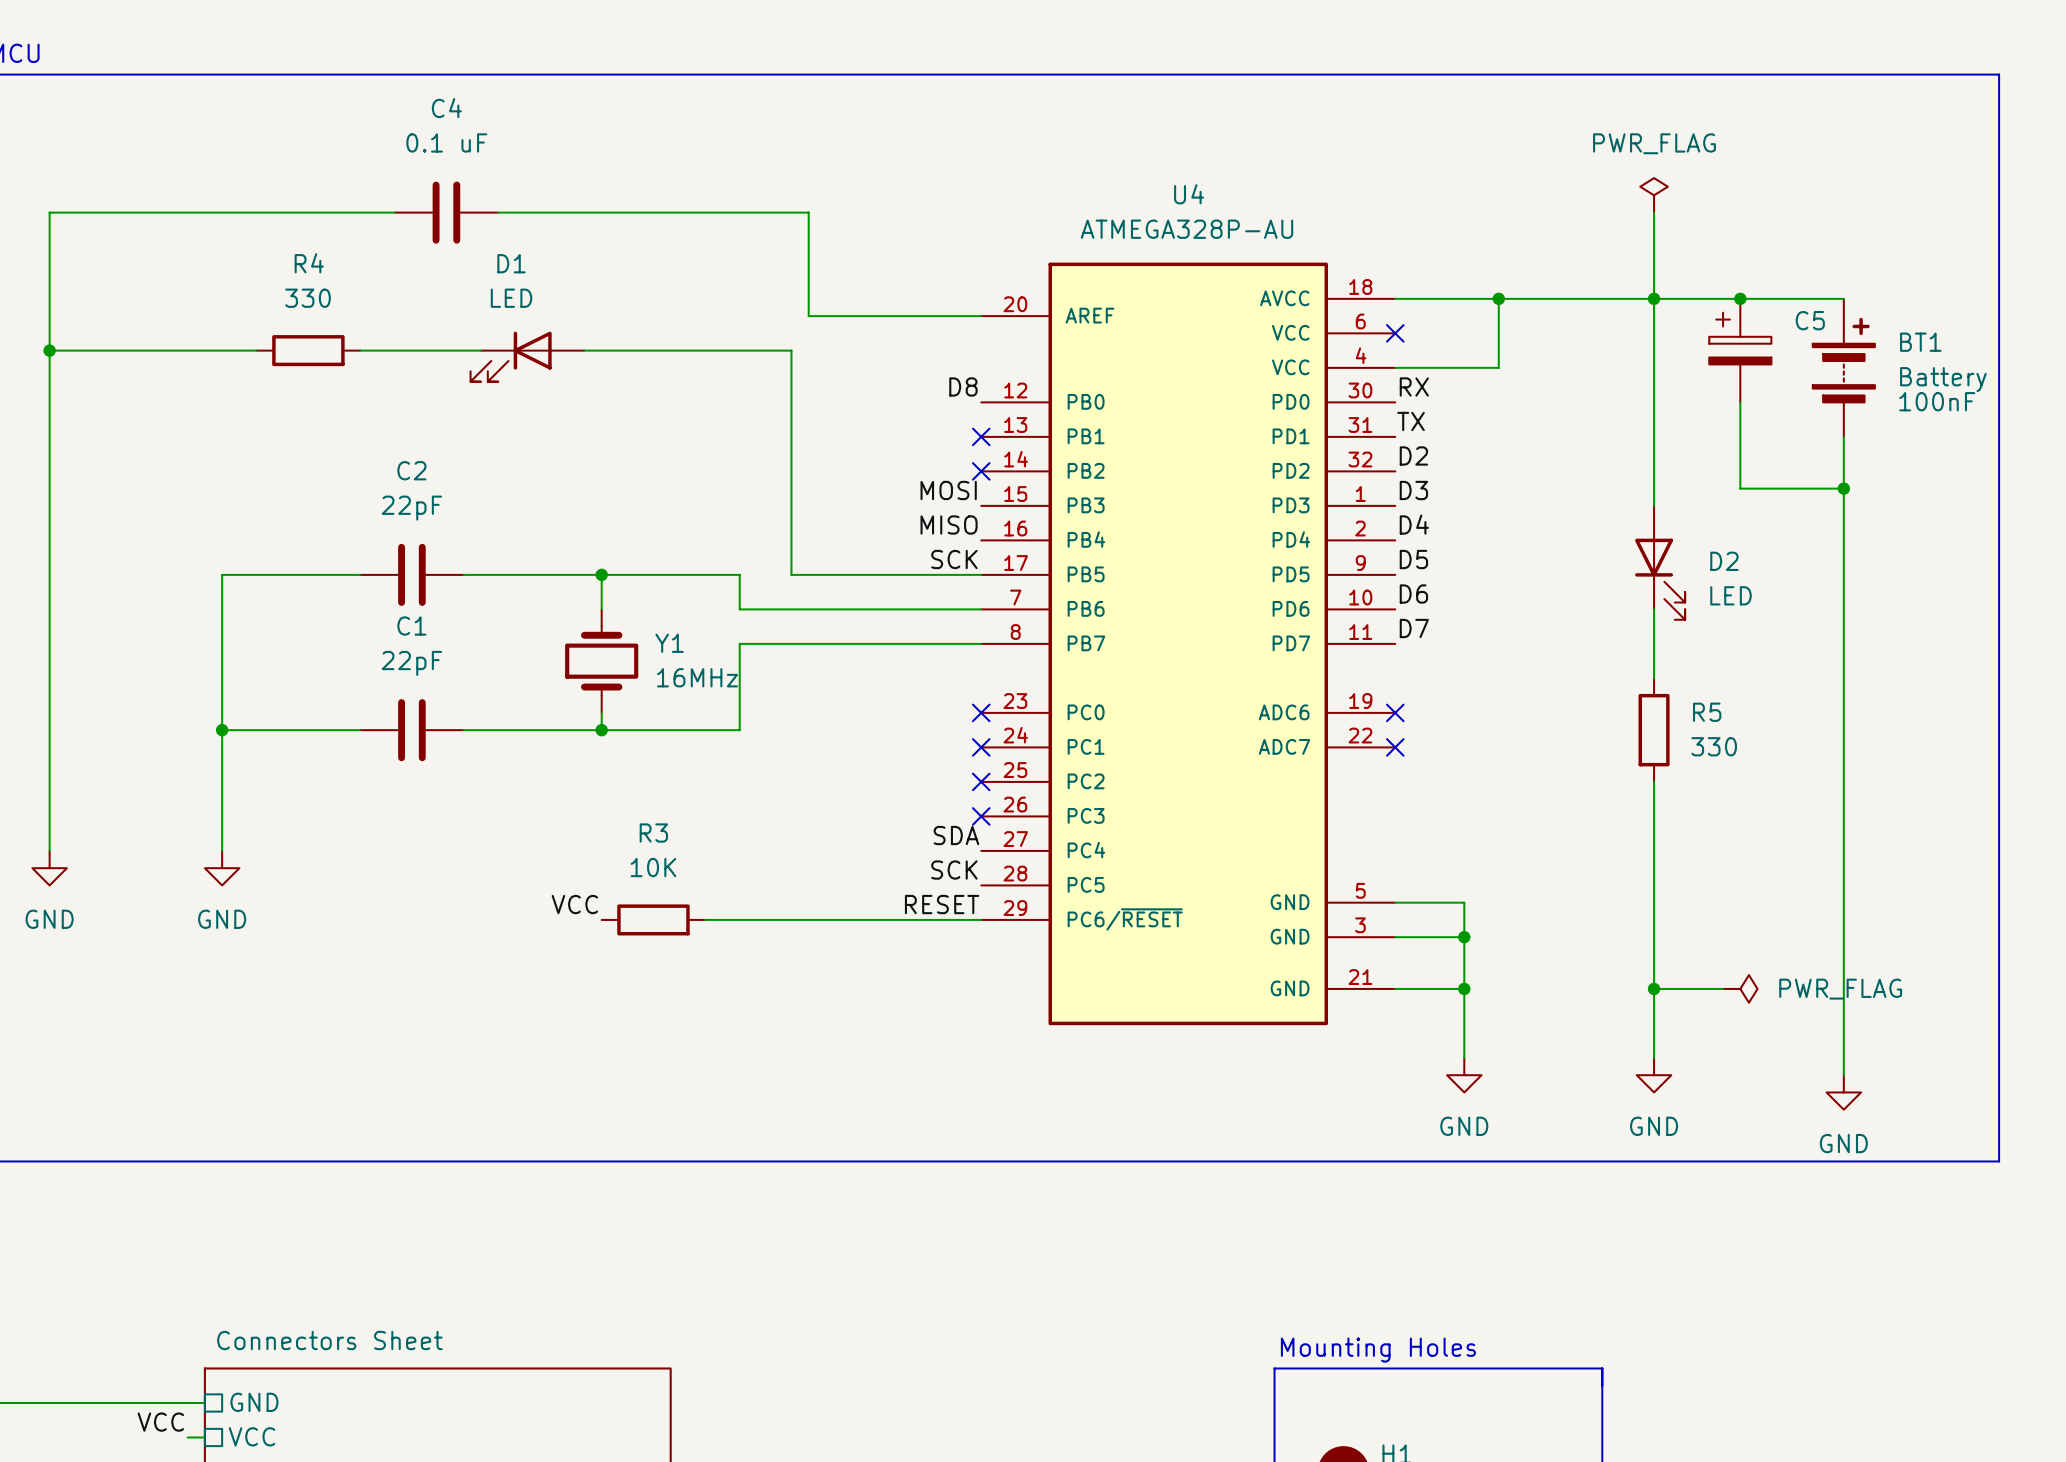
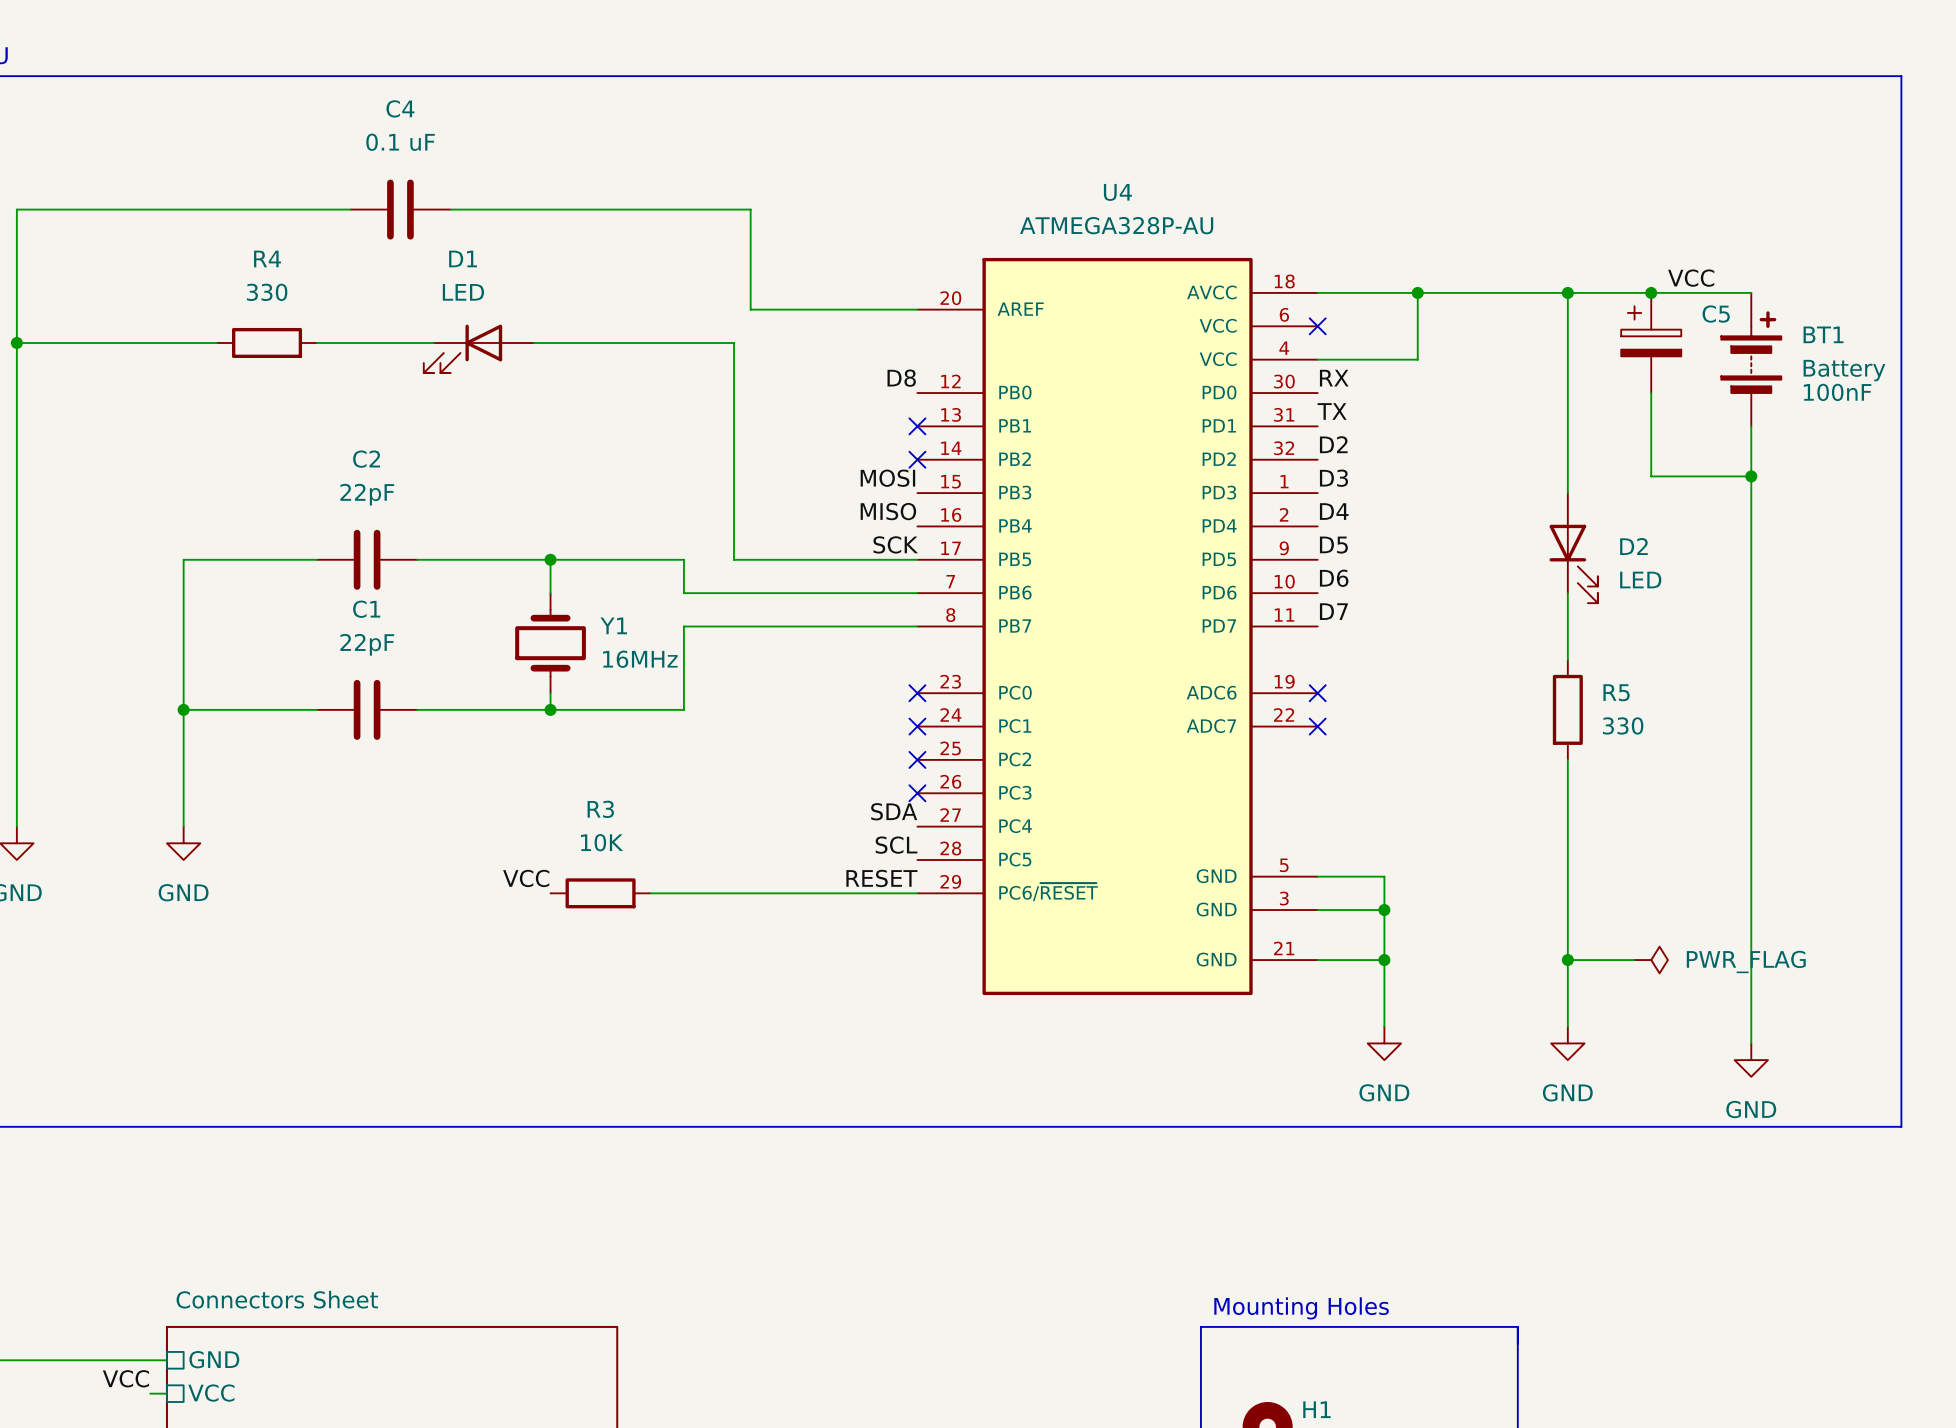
power symbol: PWR_FLAG (1654, 195) -> none
wire: (1654, 212) (1654, 298) -> none
label: none -> VCC (1691, 278)
label: SCK (954, 870) -> SCL (896, 845)

